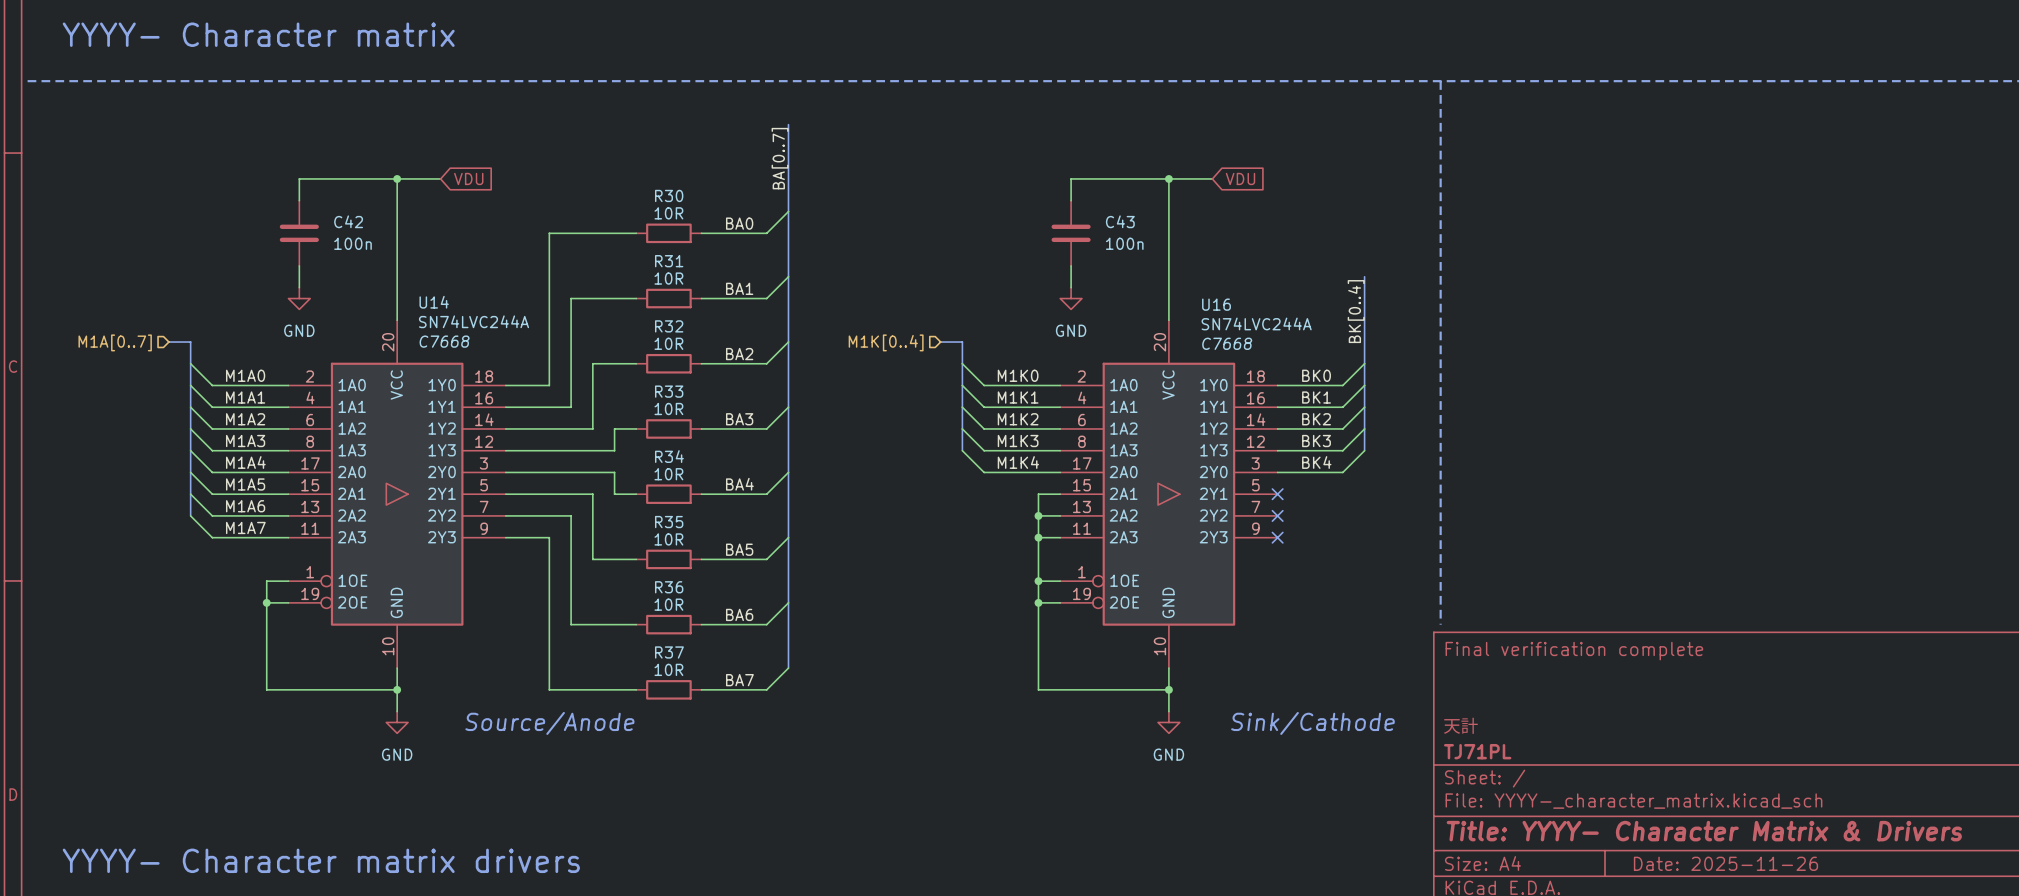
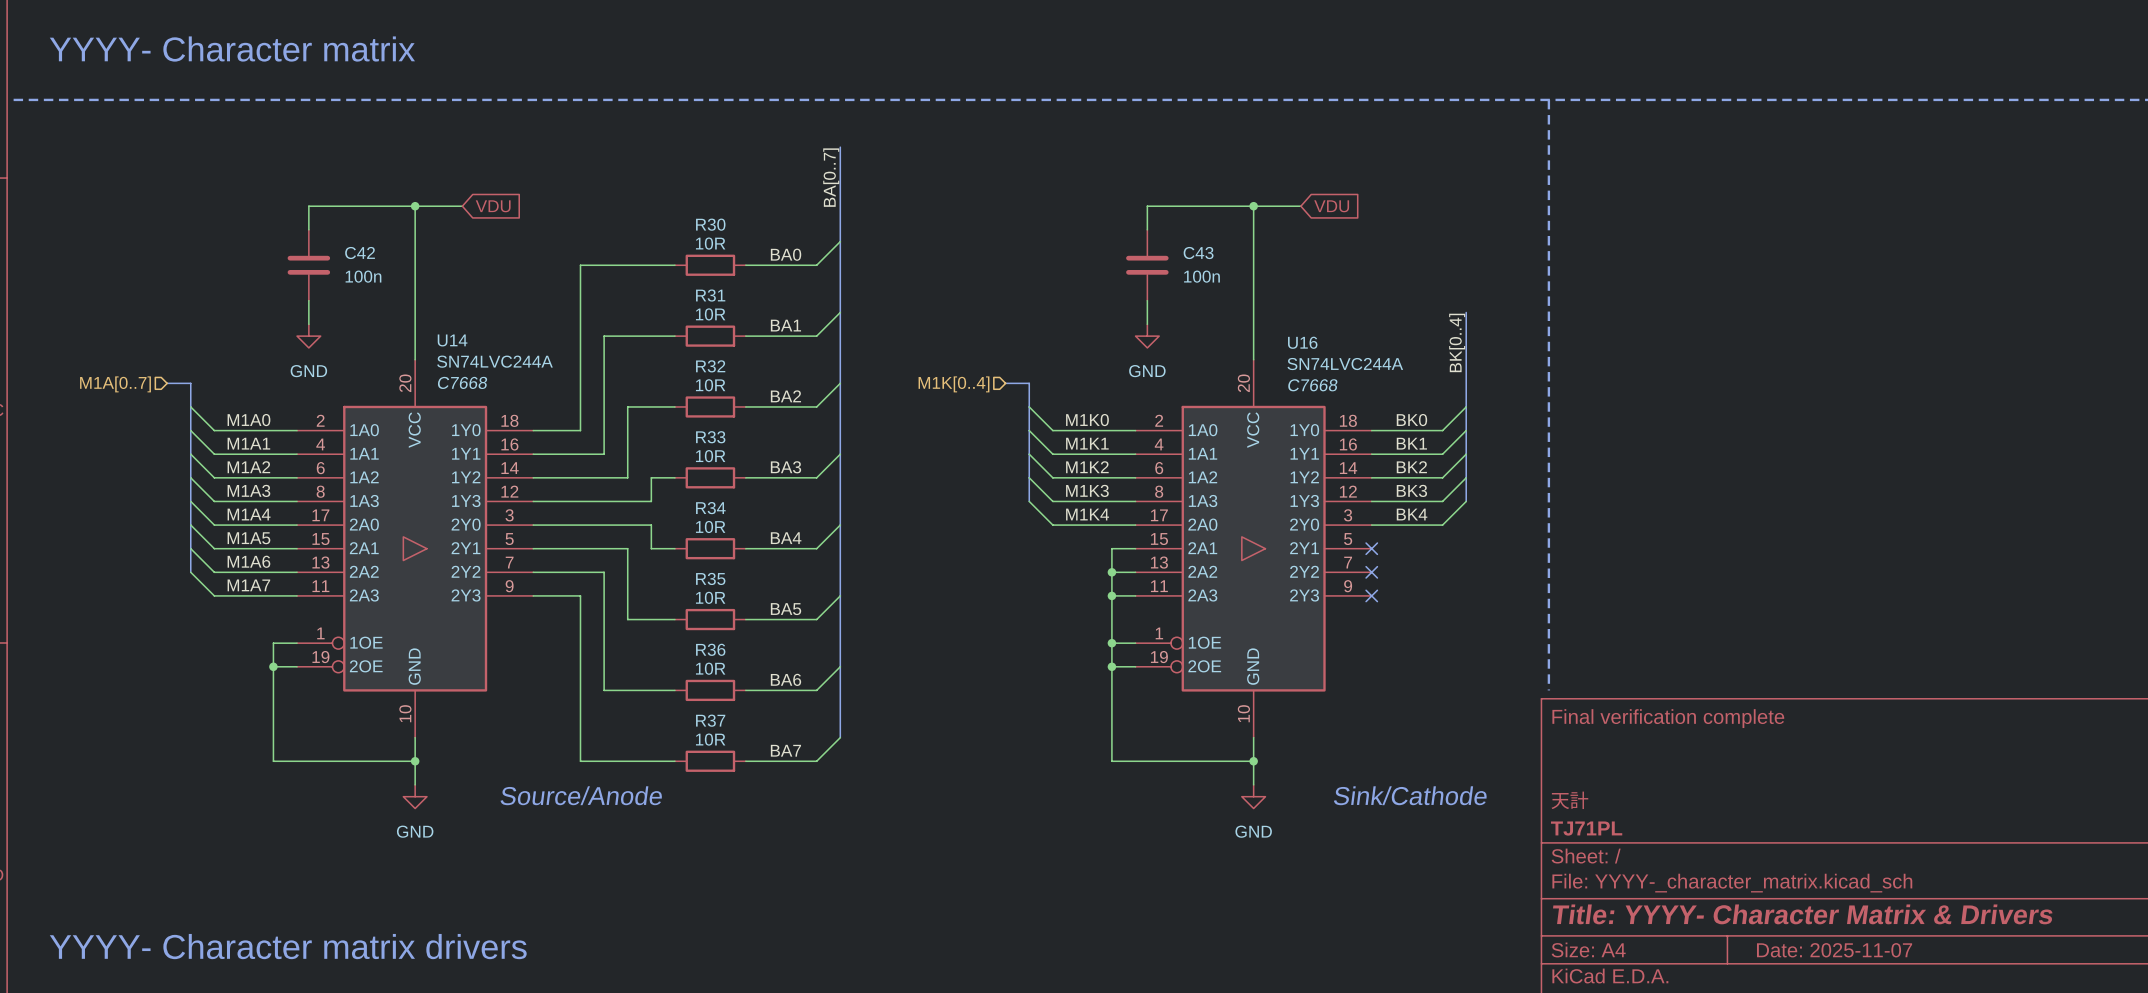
title block: Date: 2025-11-26 (1725, 863) -> Date: 2025-11-07 (1834, 950)

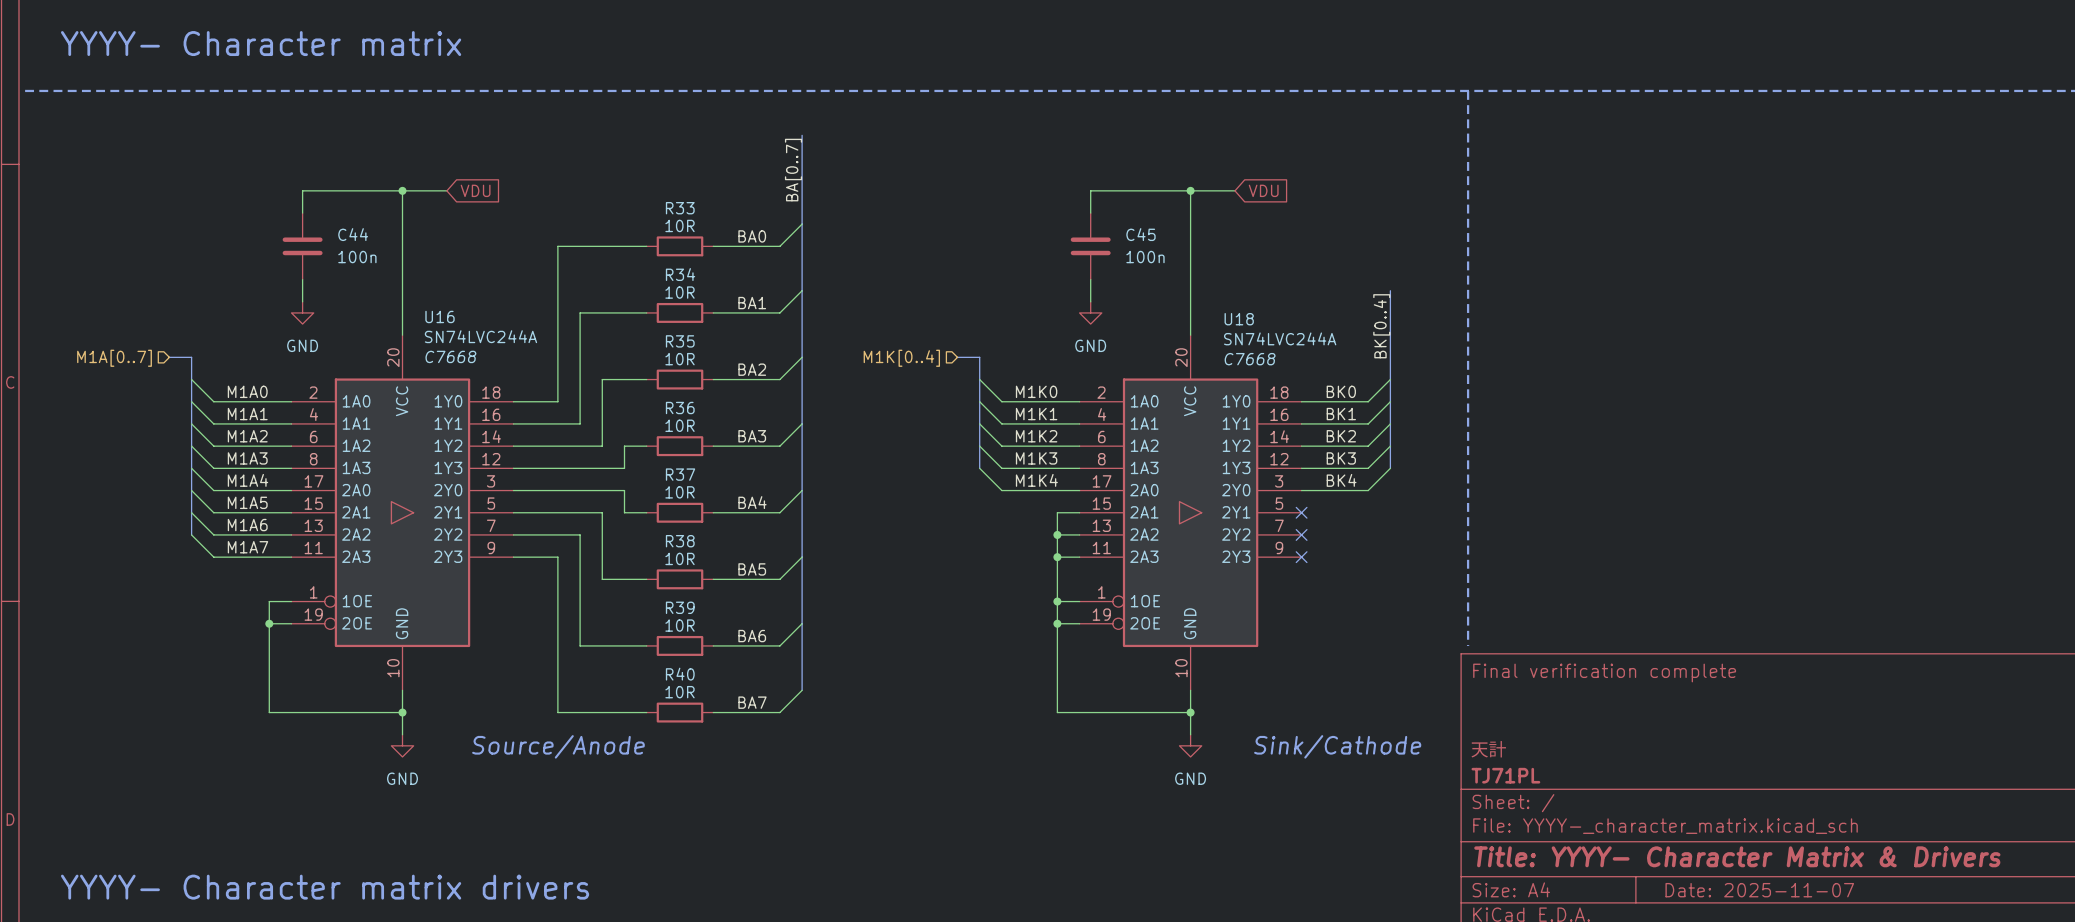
R30 name: R30 (710, 224) -> R33 (680, 208)
C42 name: C42 (360, 253) -> C44 (353, 234)
C43 name: C43 (1198, 253) -> C45 (1140, 234)
R31 name: R31 (710, 295) -> R34 (680, 274)
U14 name: U14 (452, 340) -> U16 (440, 316)
U16 name: U16 (1302, 342) -> U18 (1239, 319)
R32 name: R32 (710, 366) -> R35 (680, 341)
R33 name: R33 (710, 437) -> R36 (680, 408)
R34 name: R34 (710, 508) -> R37 (680, 474)
R35 name: R35 (710, 578) -> R38 (680, 541)
R36 name: R36 (710, 649) -> R39 (680, 607)
R37 name: R37 (710, 720) -> R40 (680, 674)

